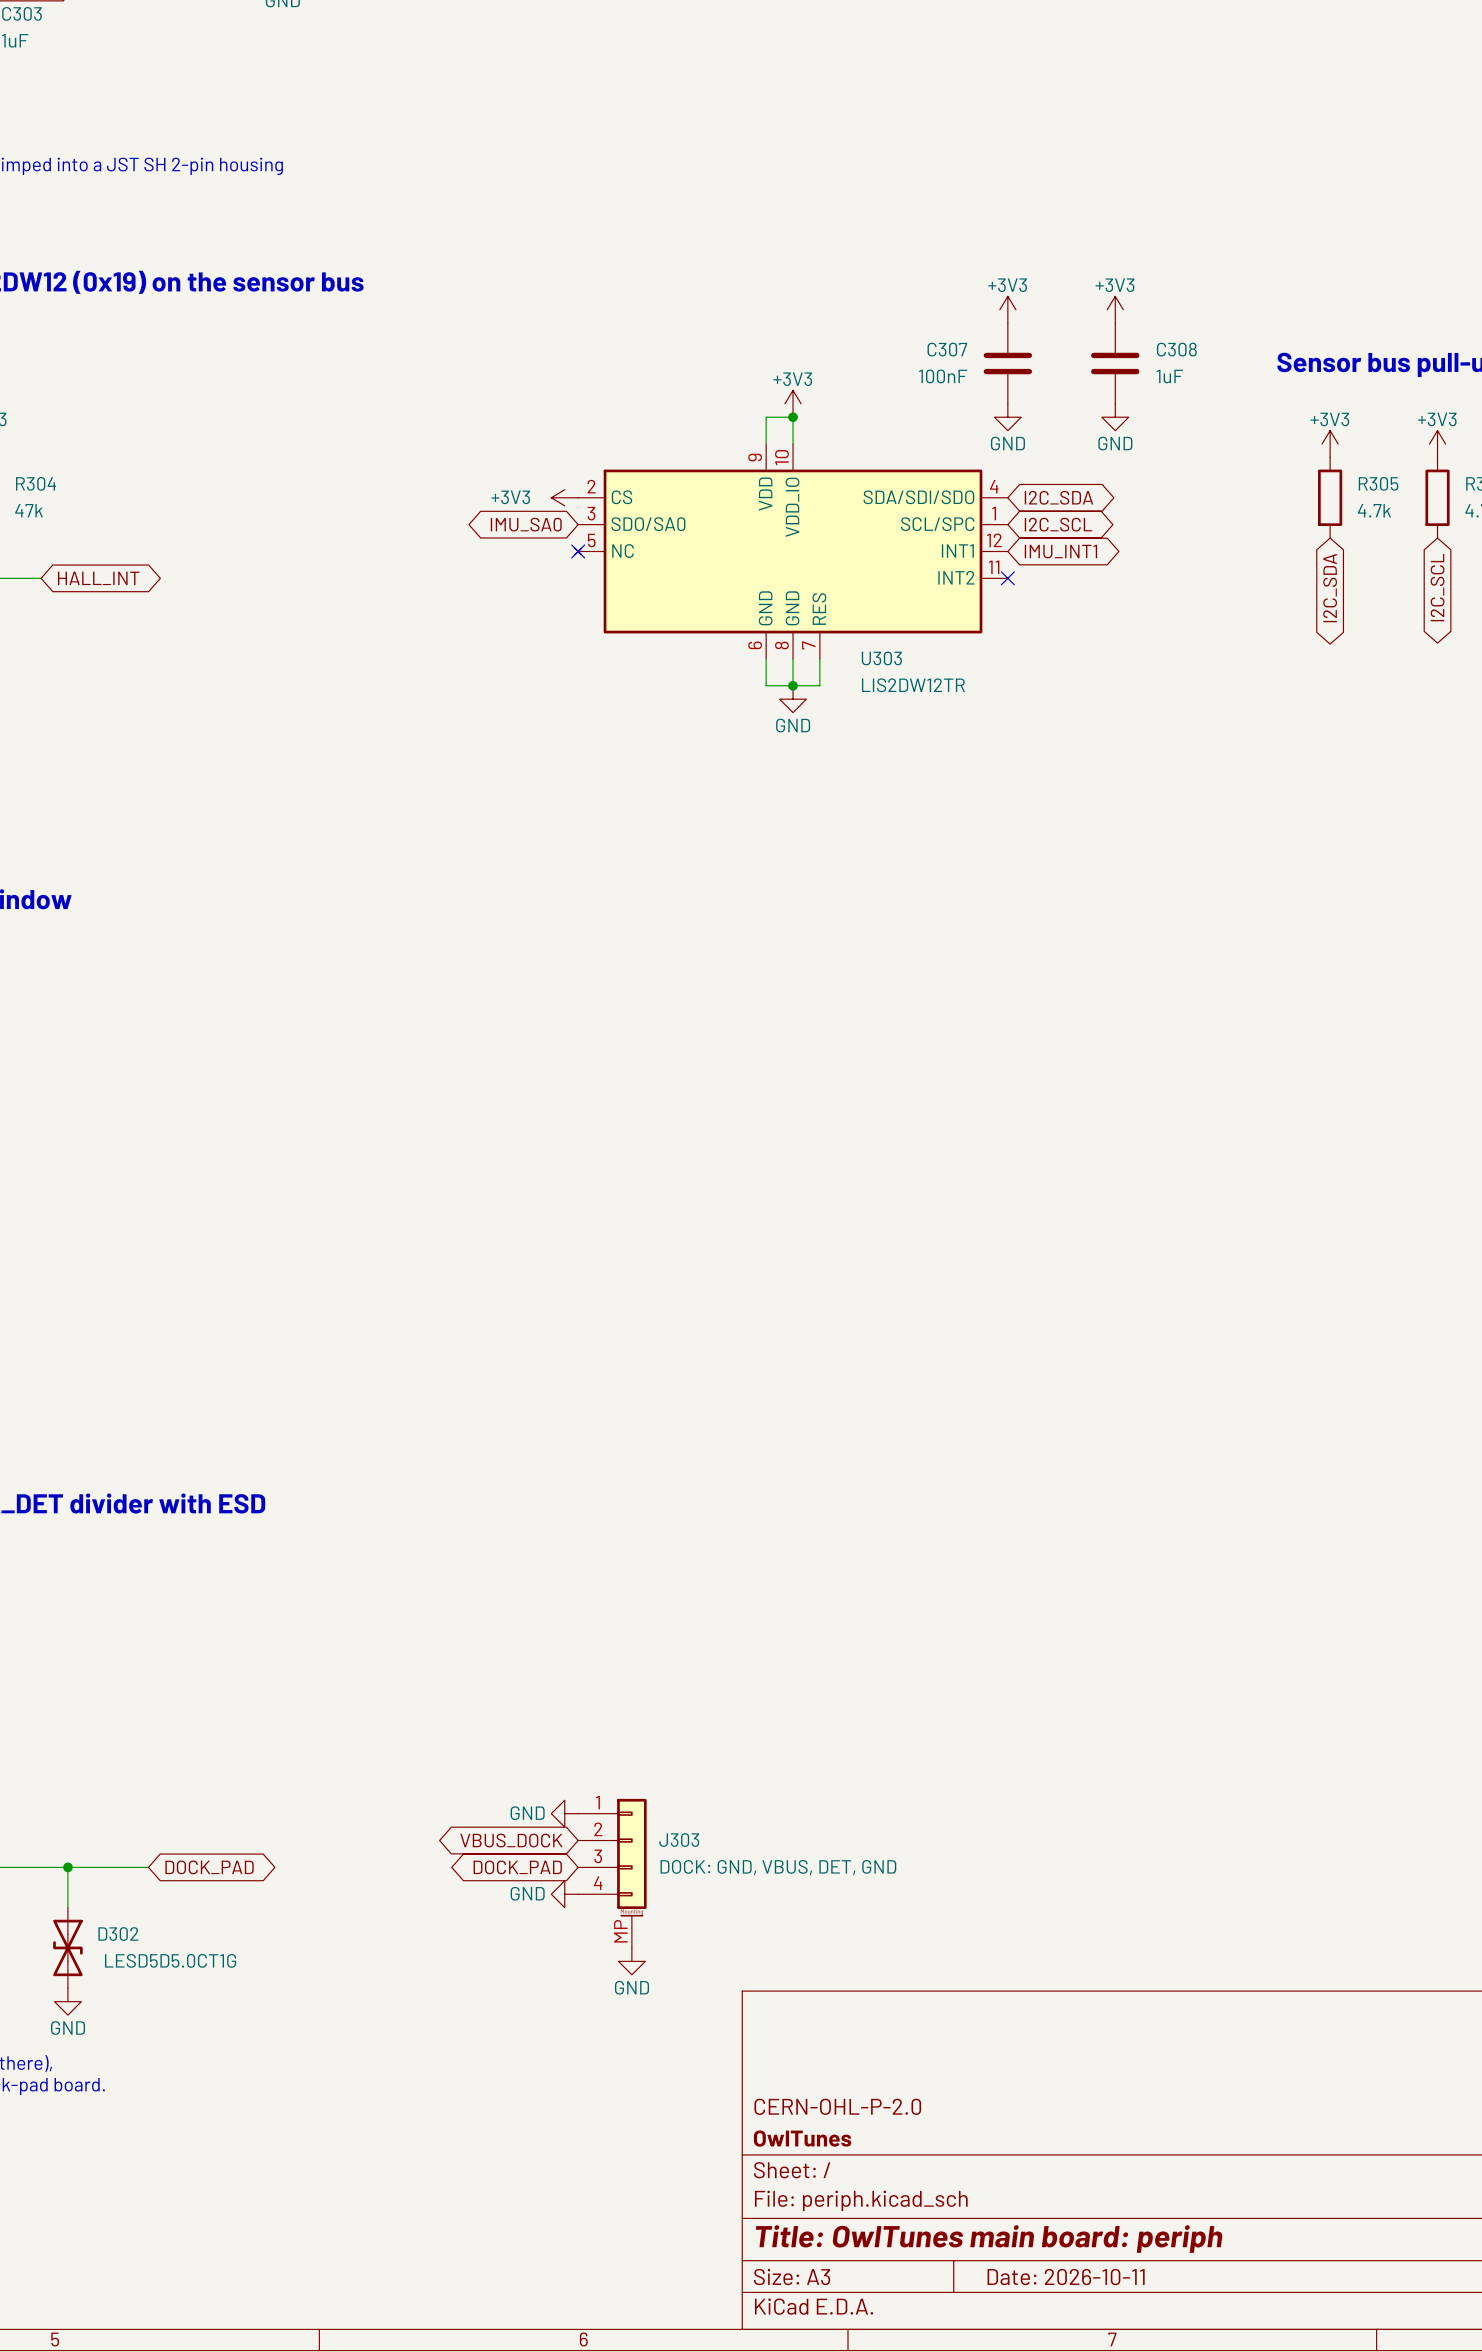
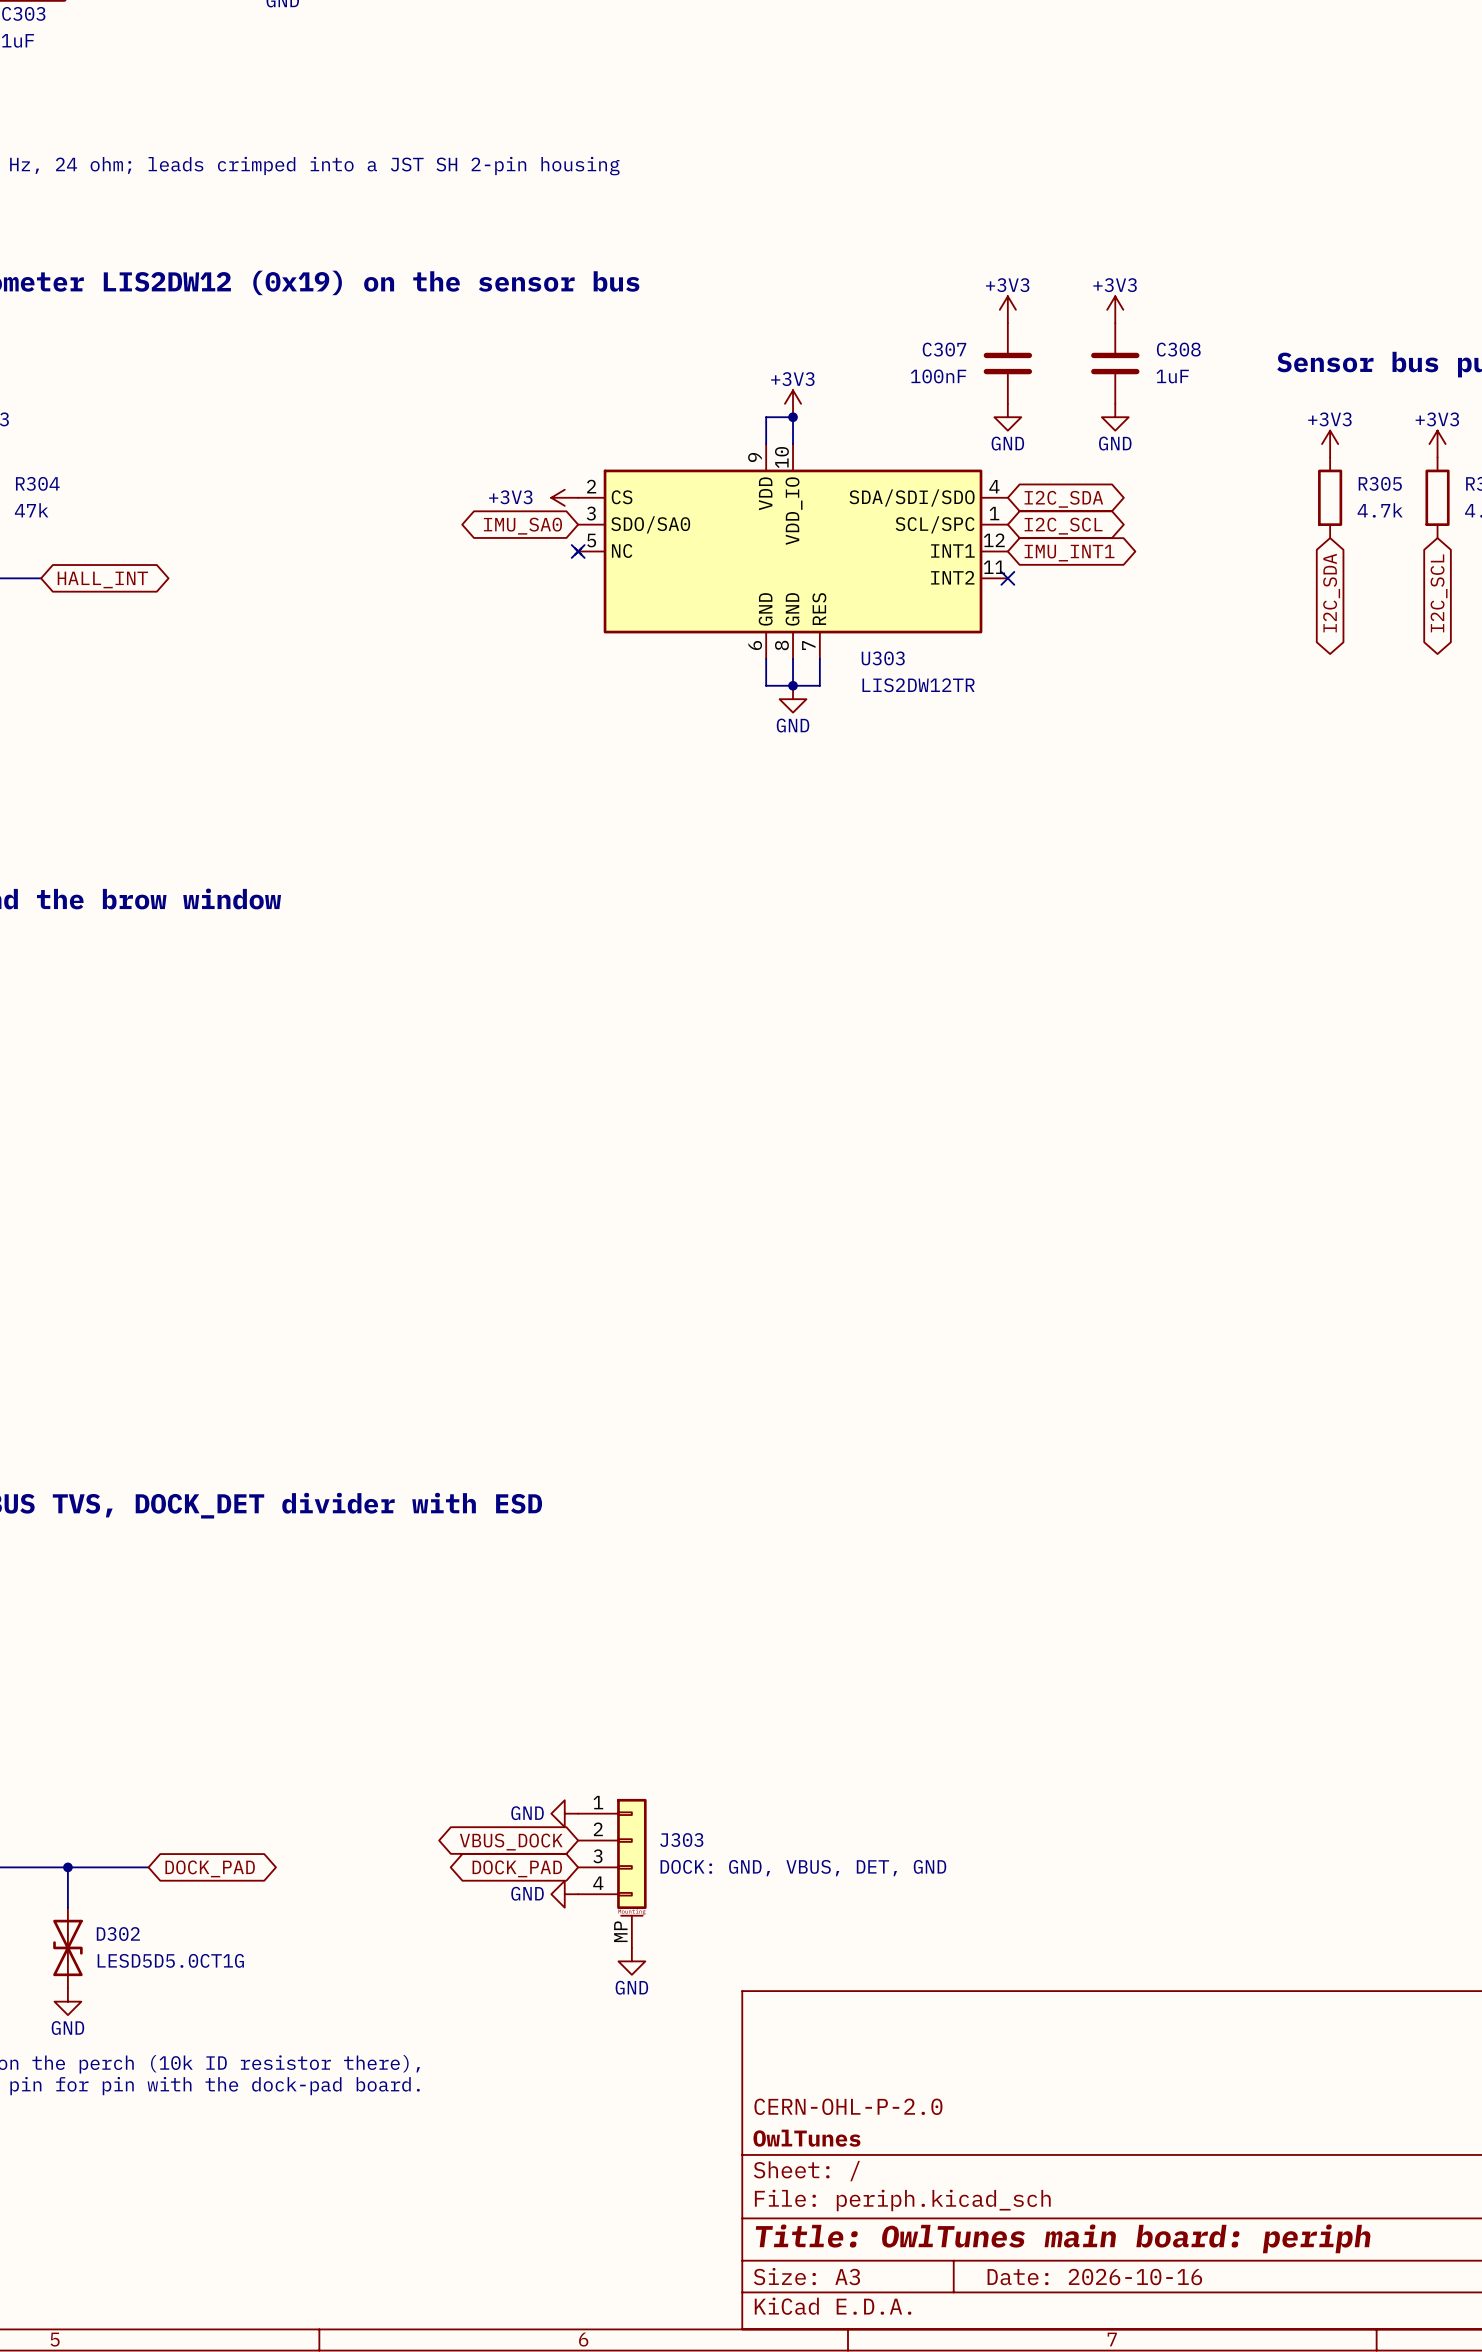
title block: Date: 2026-10-11 (1066, 2277) -> Date: 2026-10-16 (1094, 2277)

